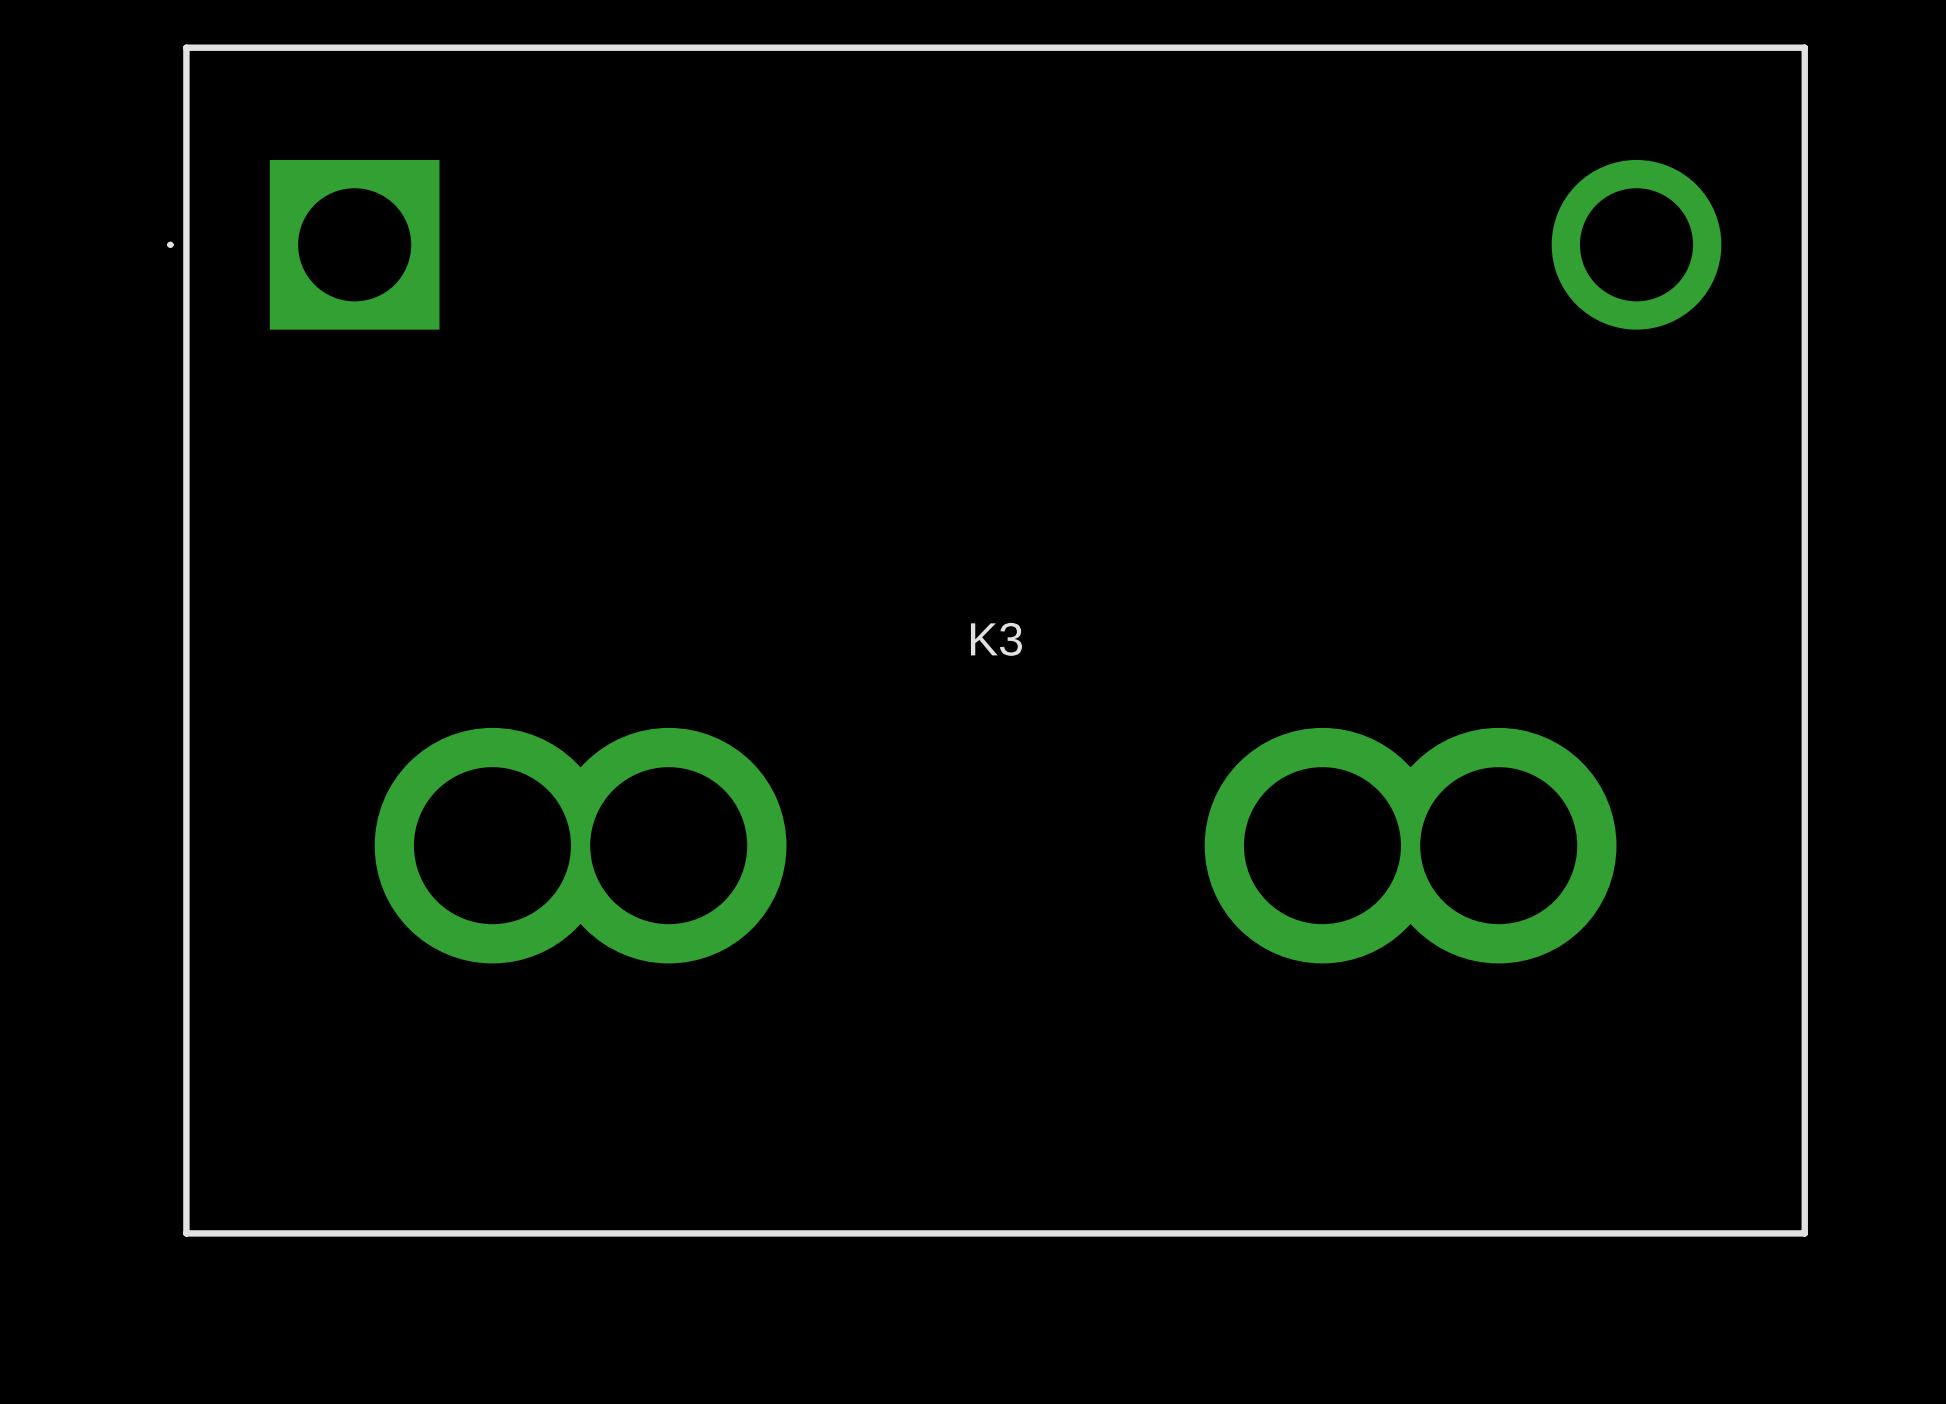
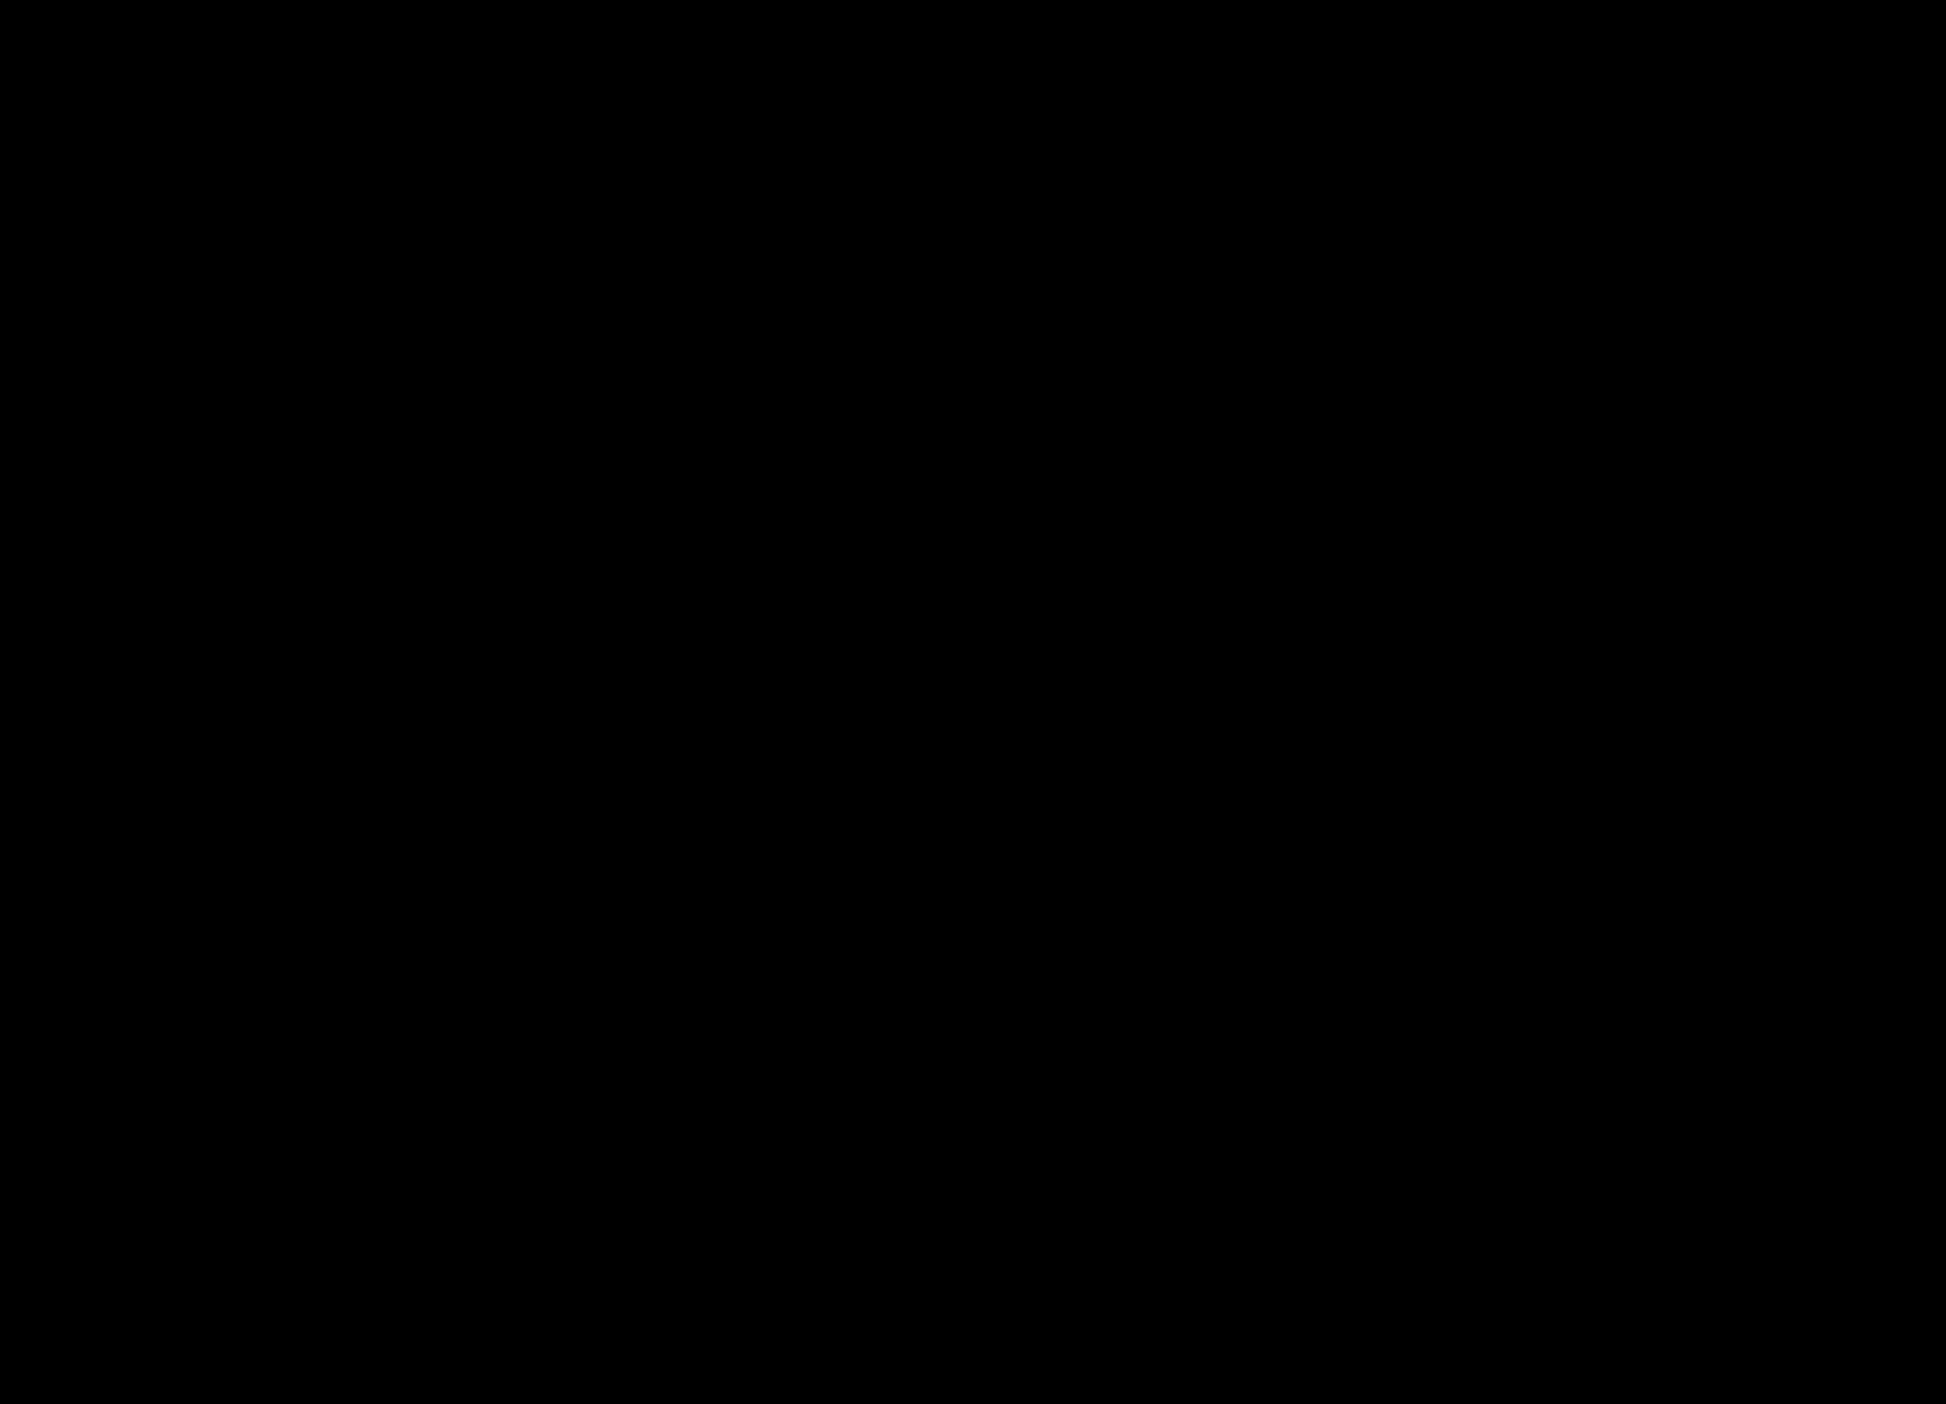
K3: (987, 640) -> none

